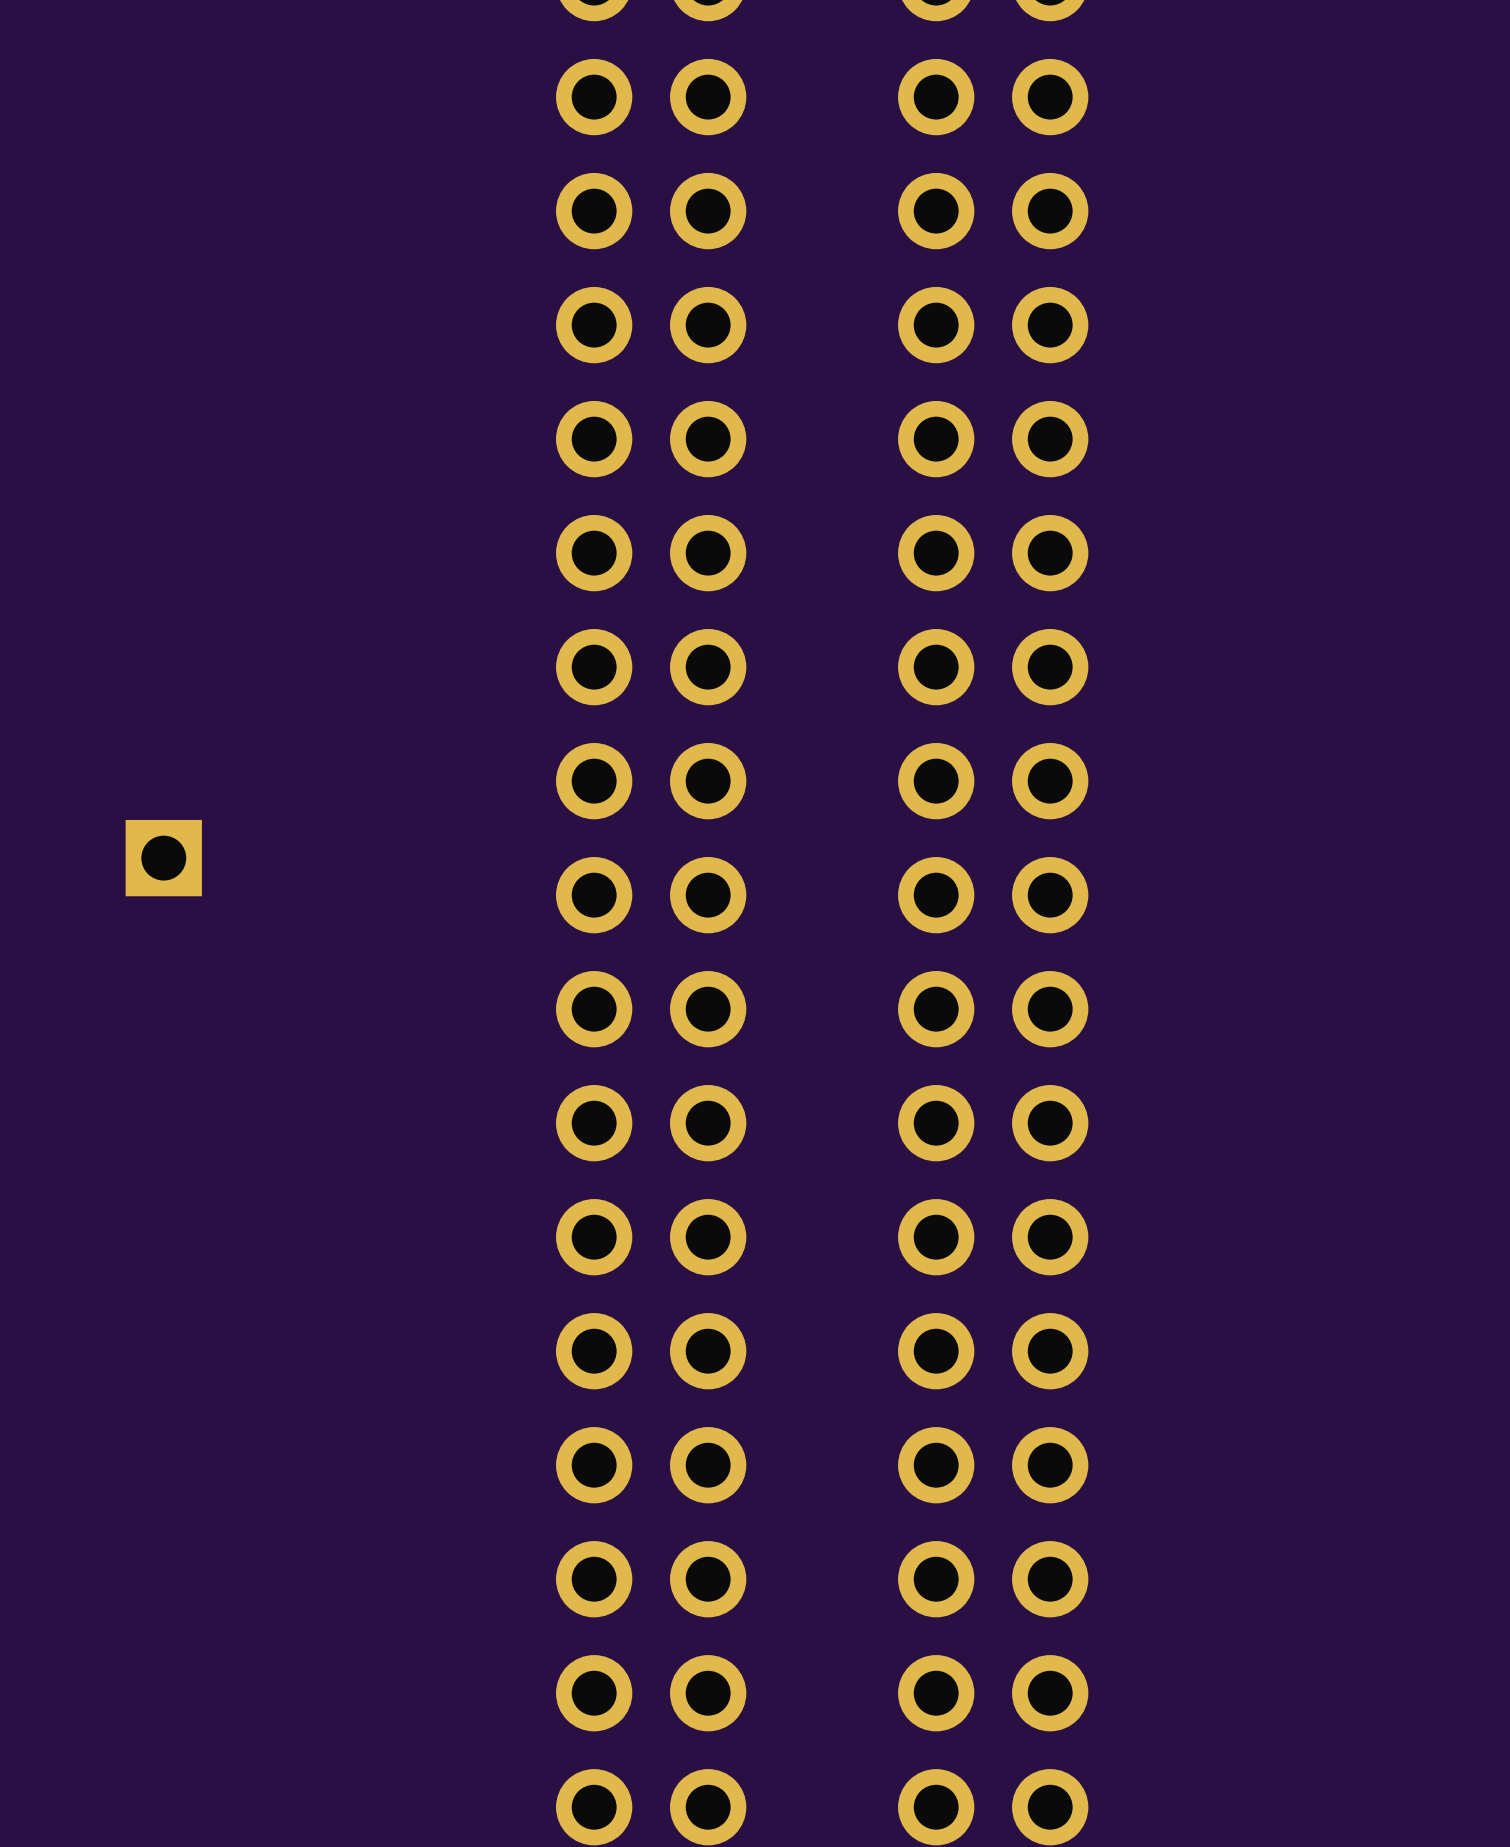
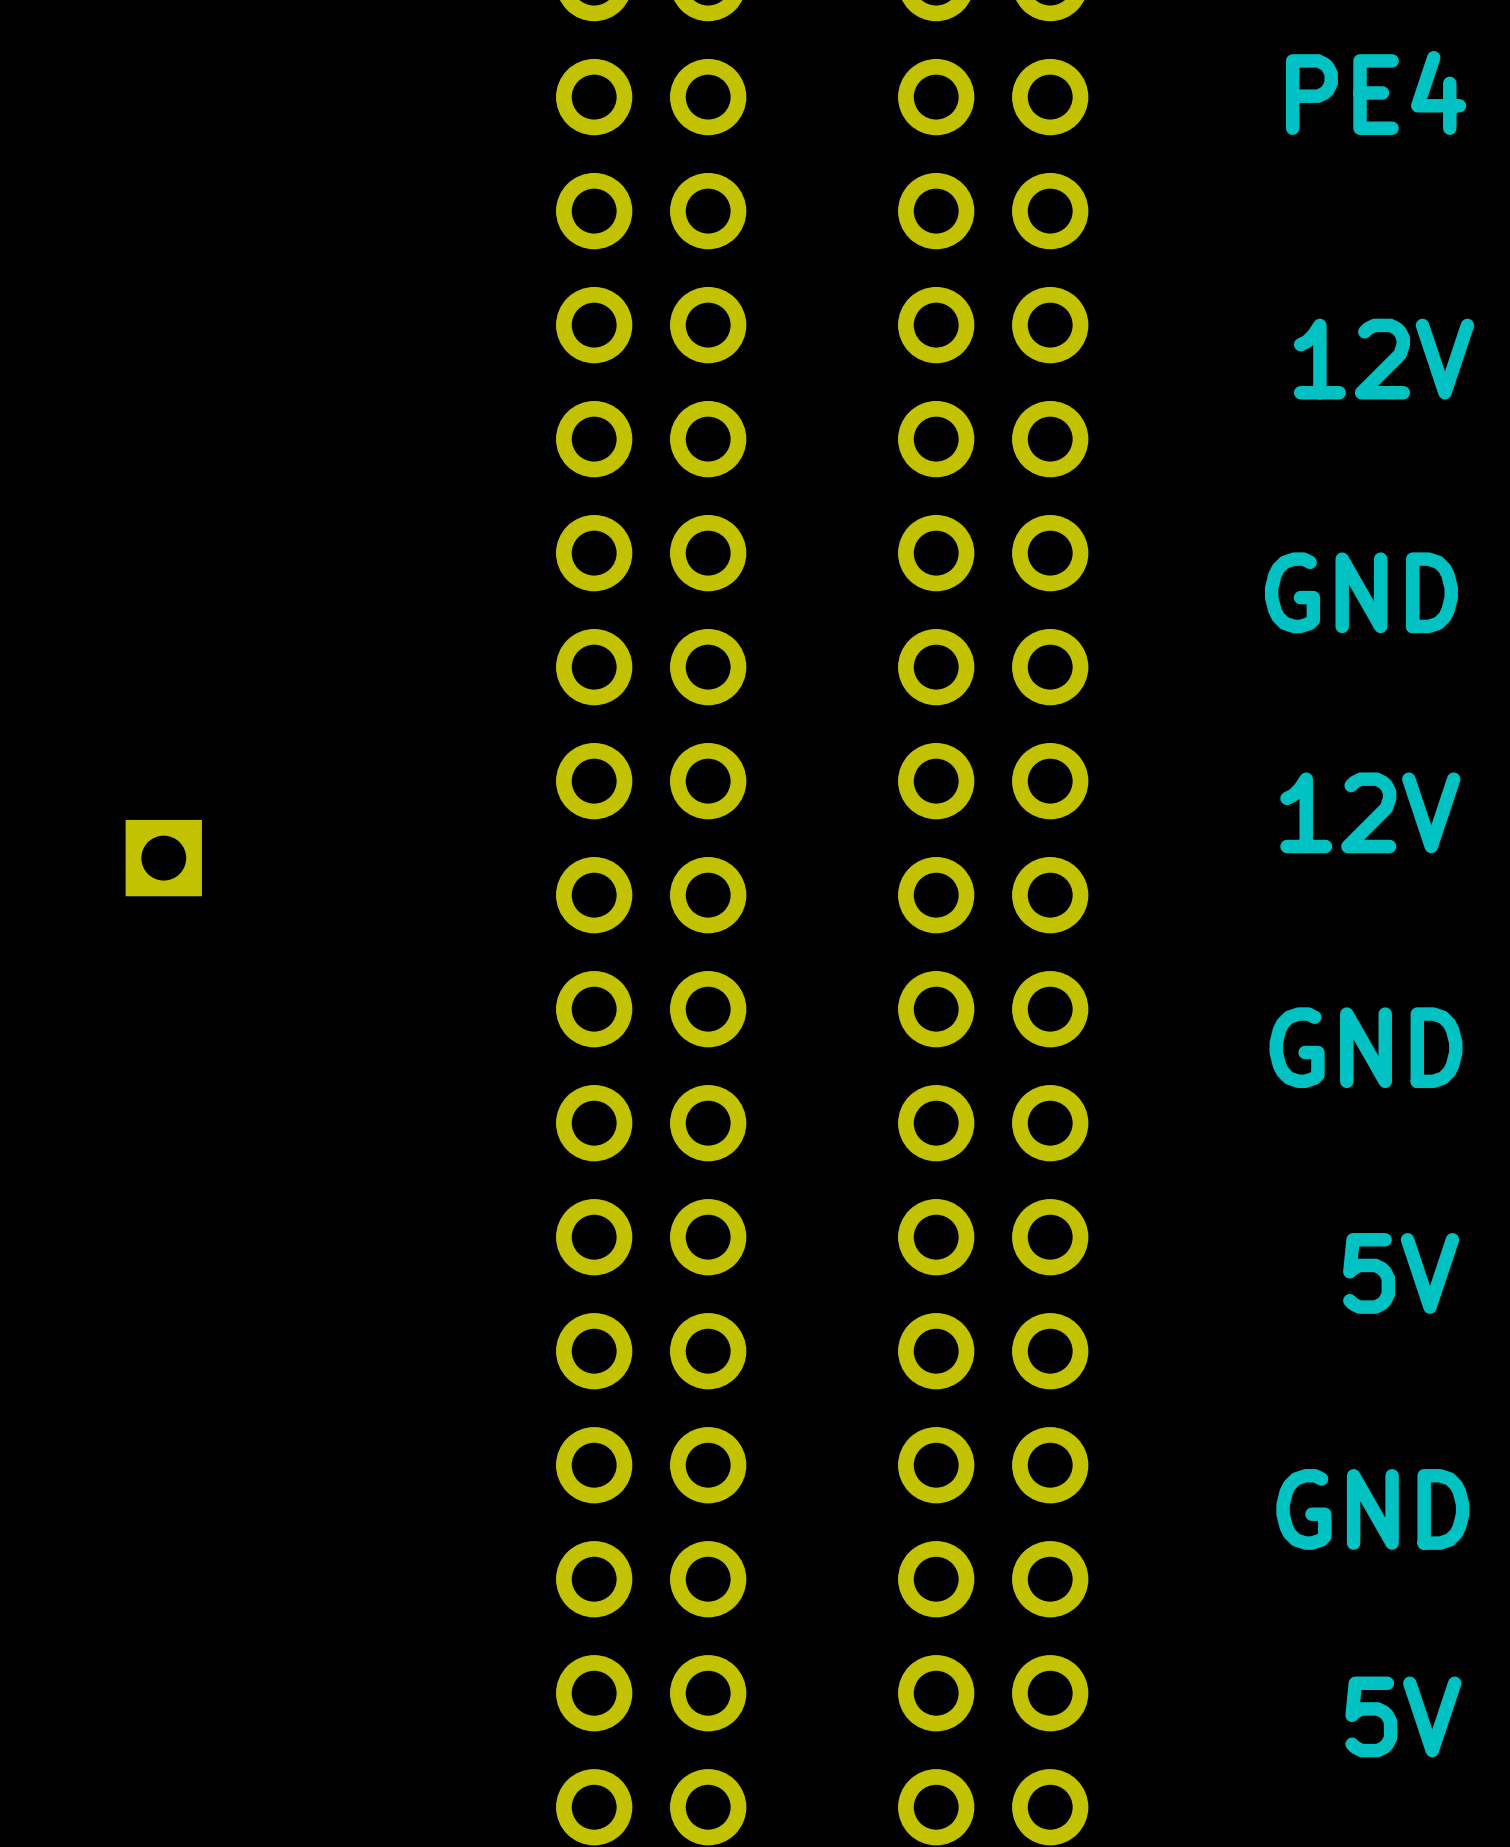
text: none -> PE4 (1376, 92)
text: none -> 12V (1384, 359)
text: none -> GND (1361, 592)
text: none -> 12V (1370, 812)
text: none -> GND (1366, 1047)
text: none -> 5V (1401, 1273)
text: none -> GND (1372, 1509)
text: none -> 5V (1403, 1716)

